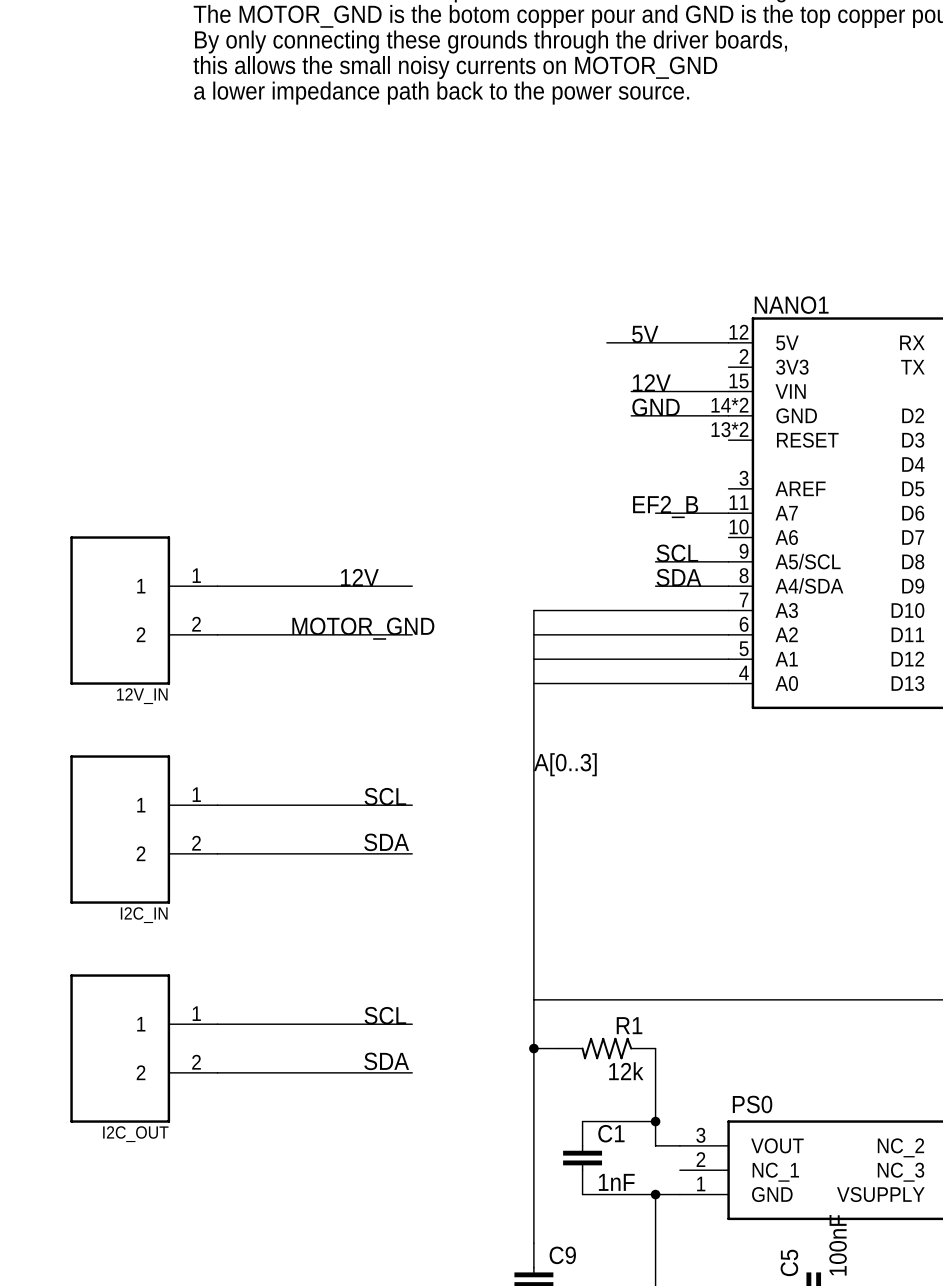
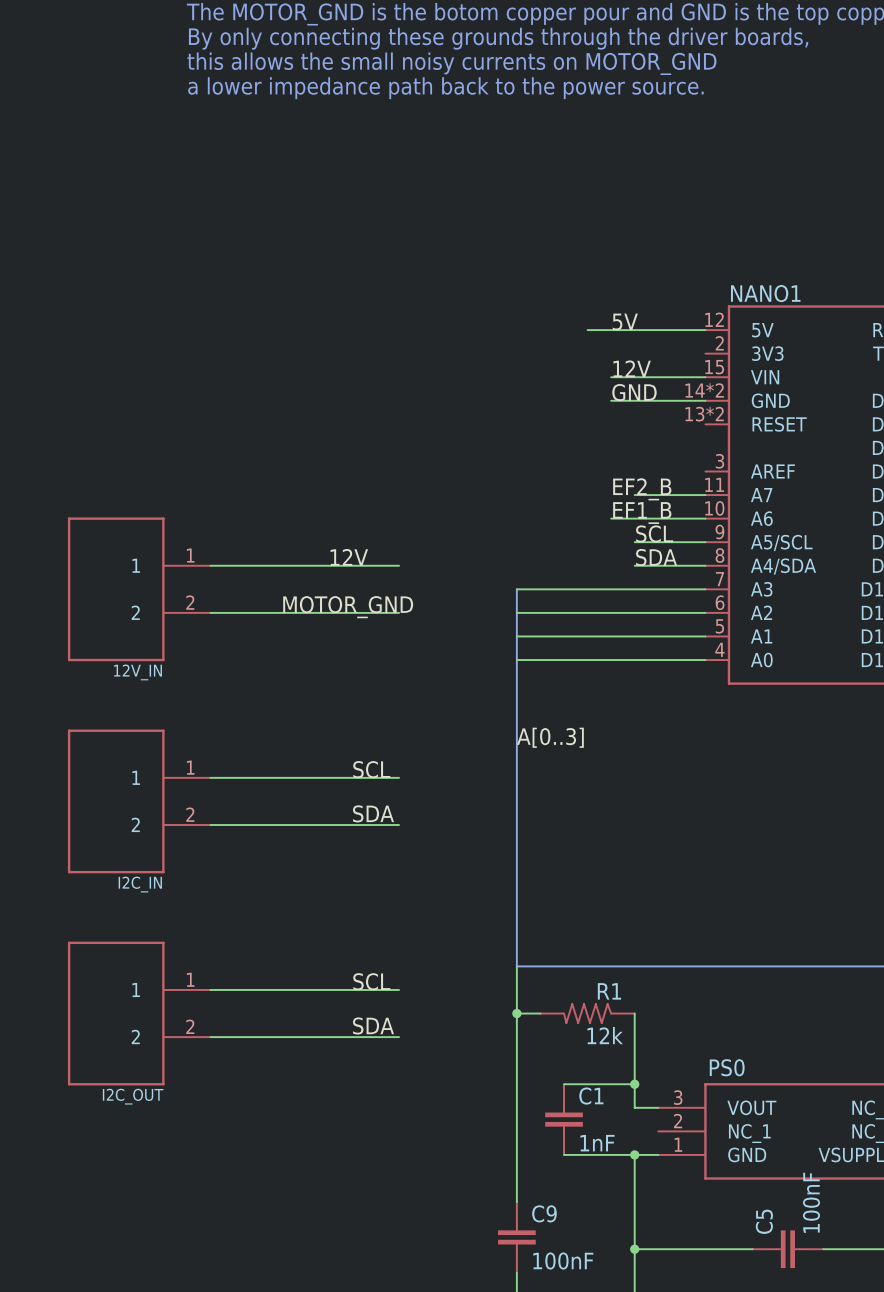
label: none -> EF1_B (642, 513)
wire: none -> (611, 518) (705, 518)

